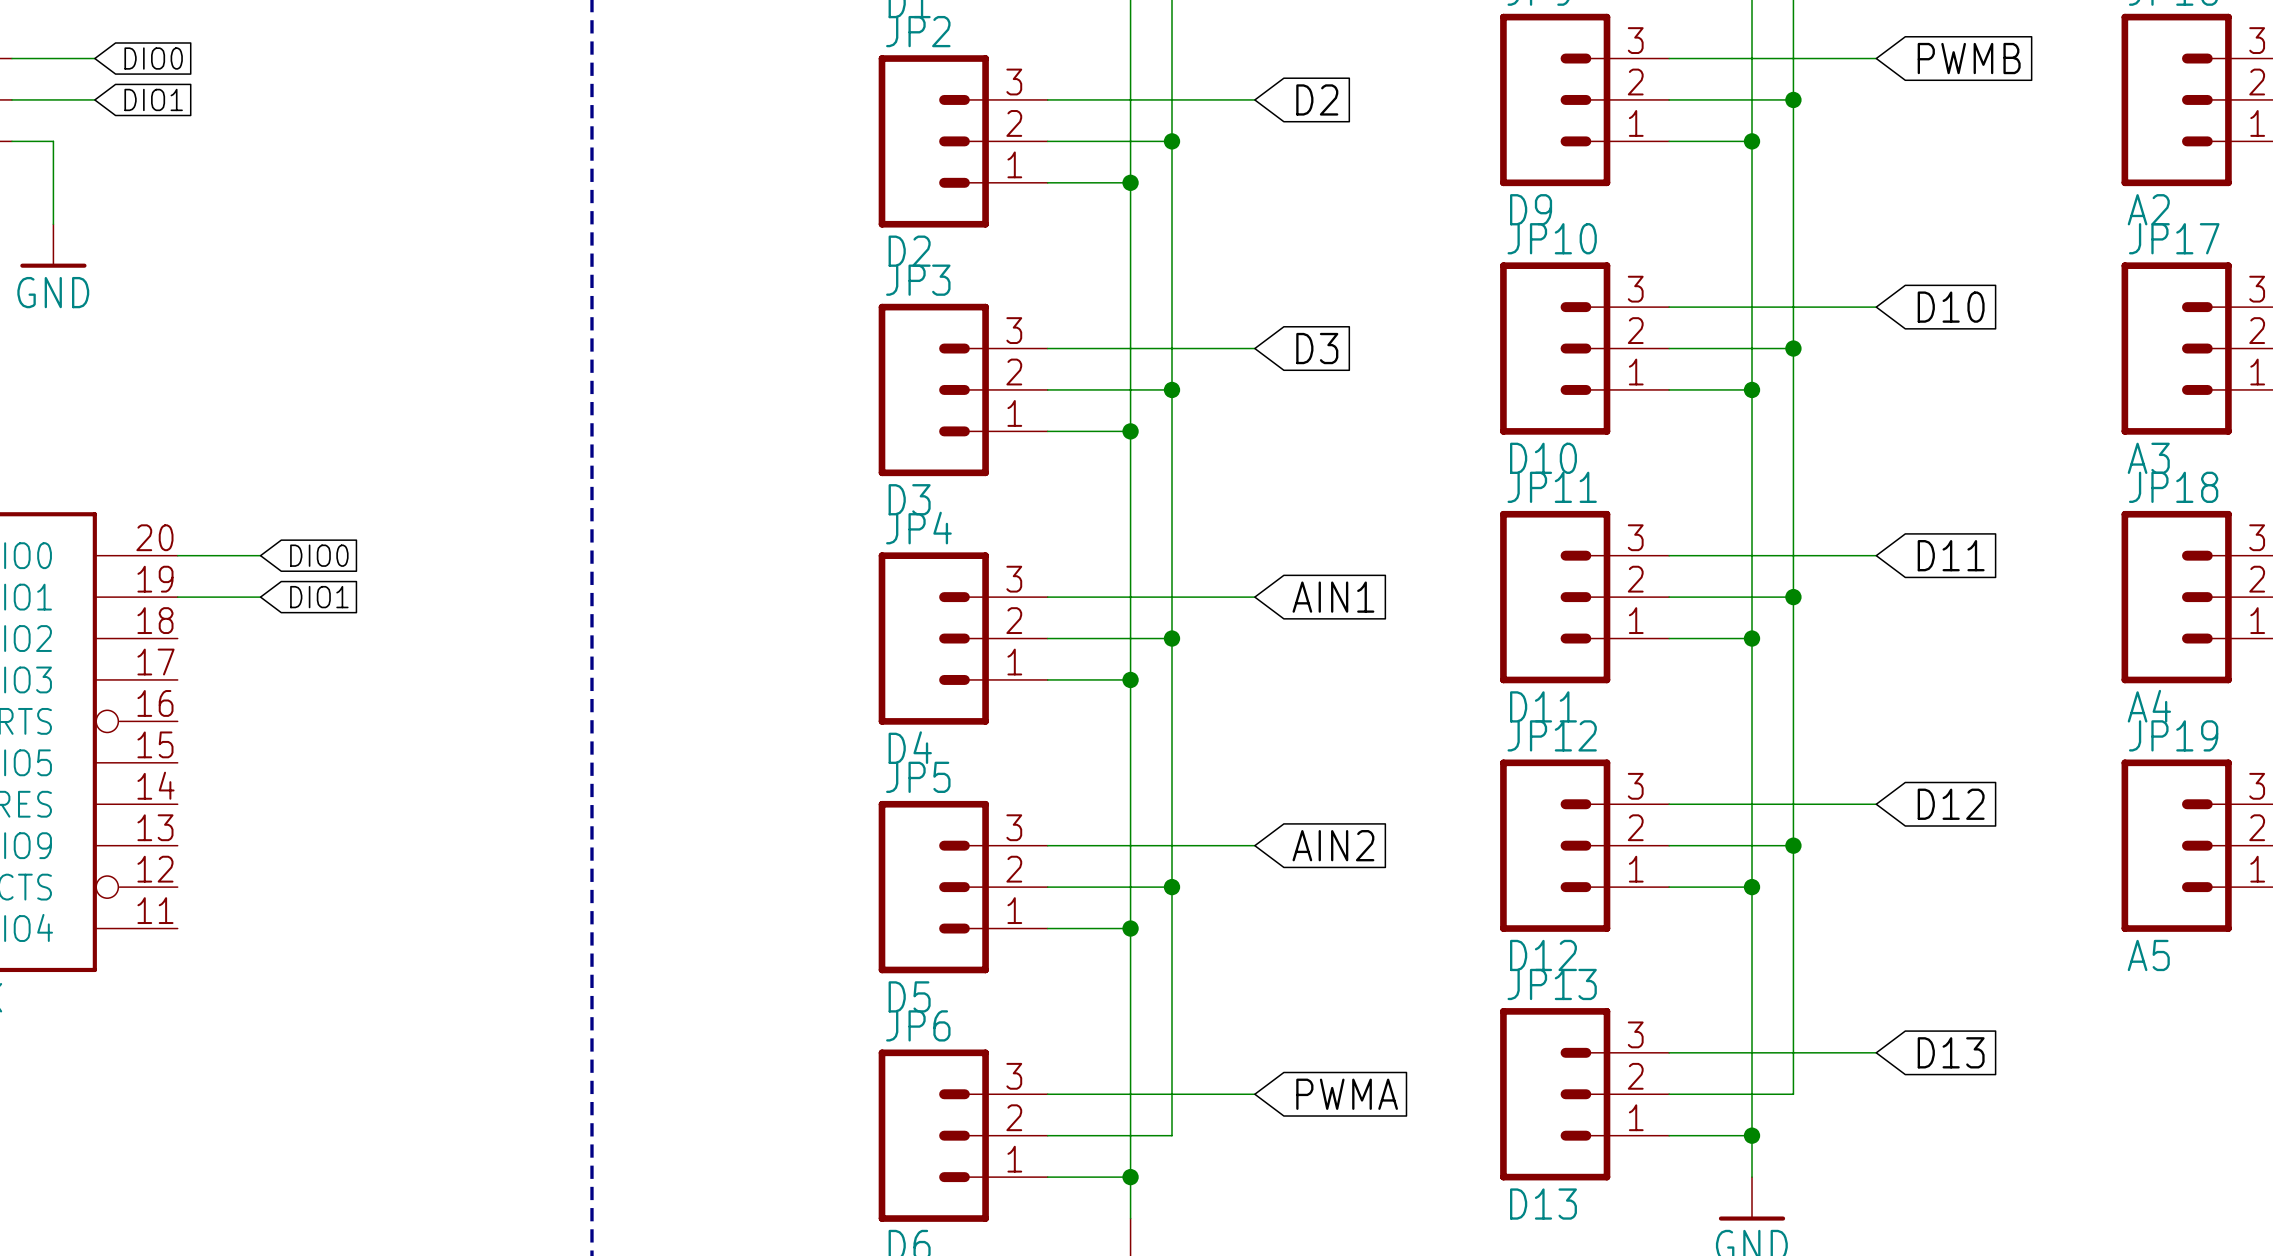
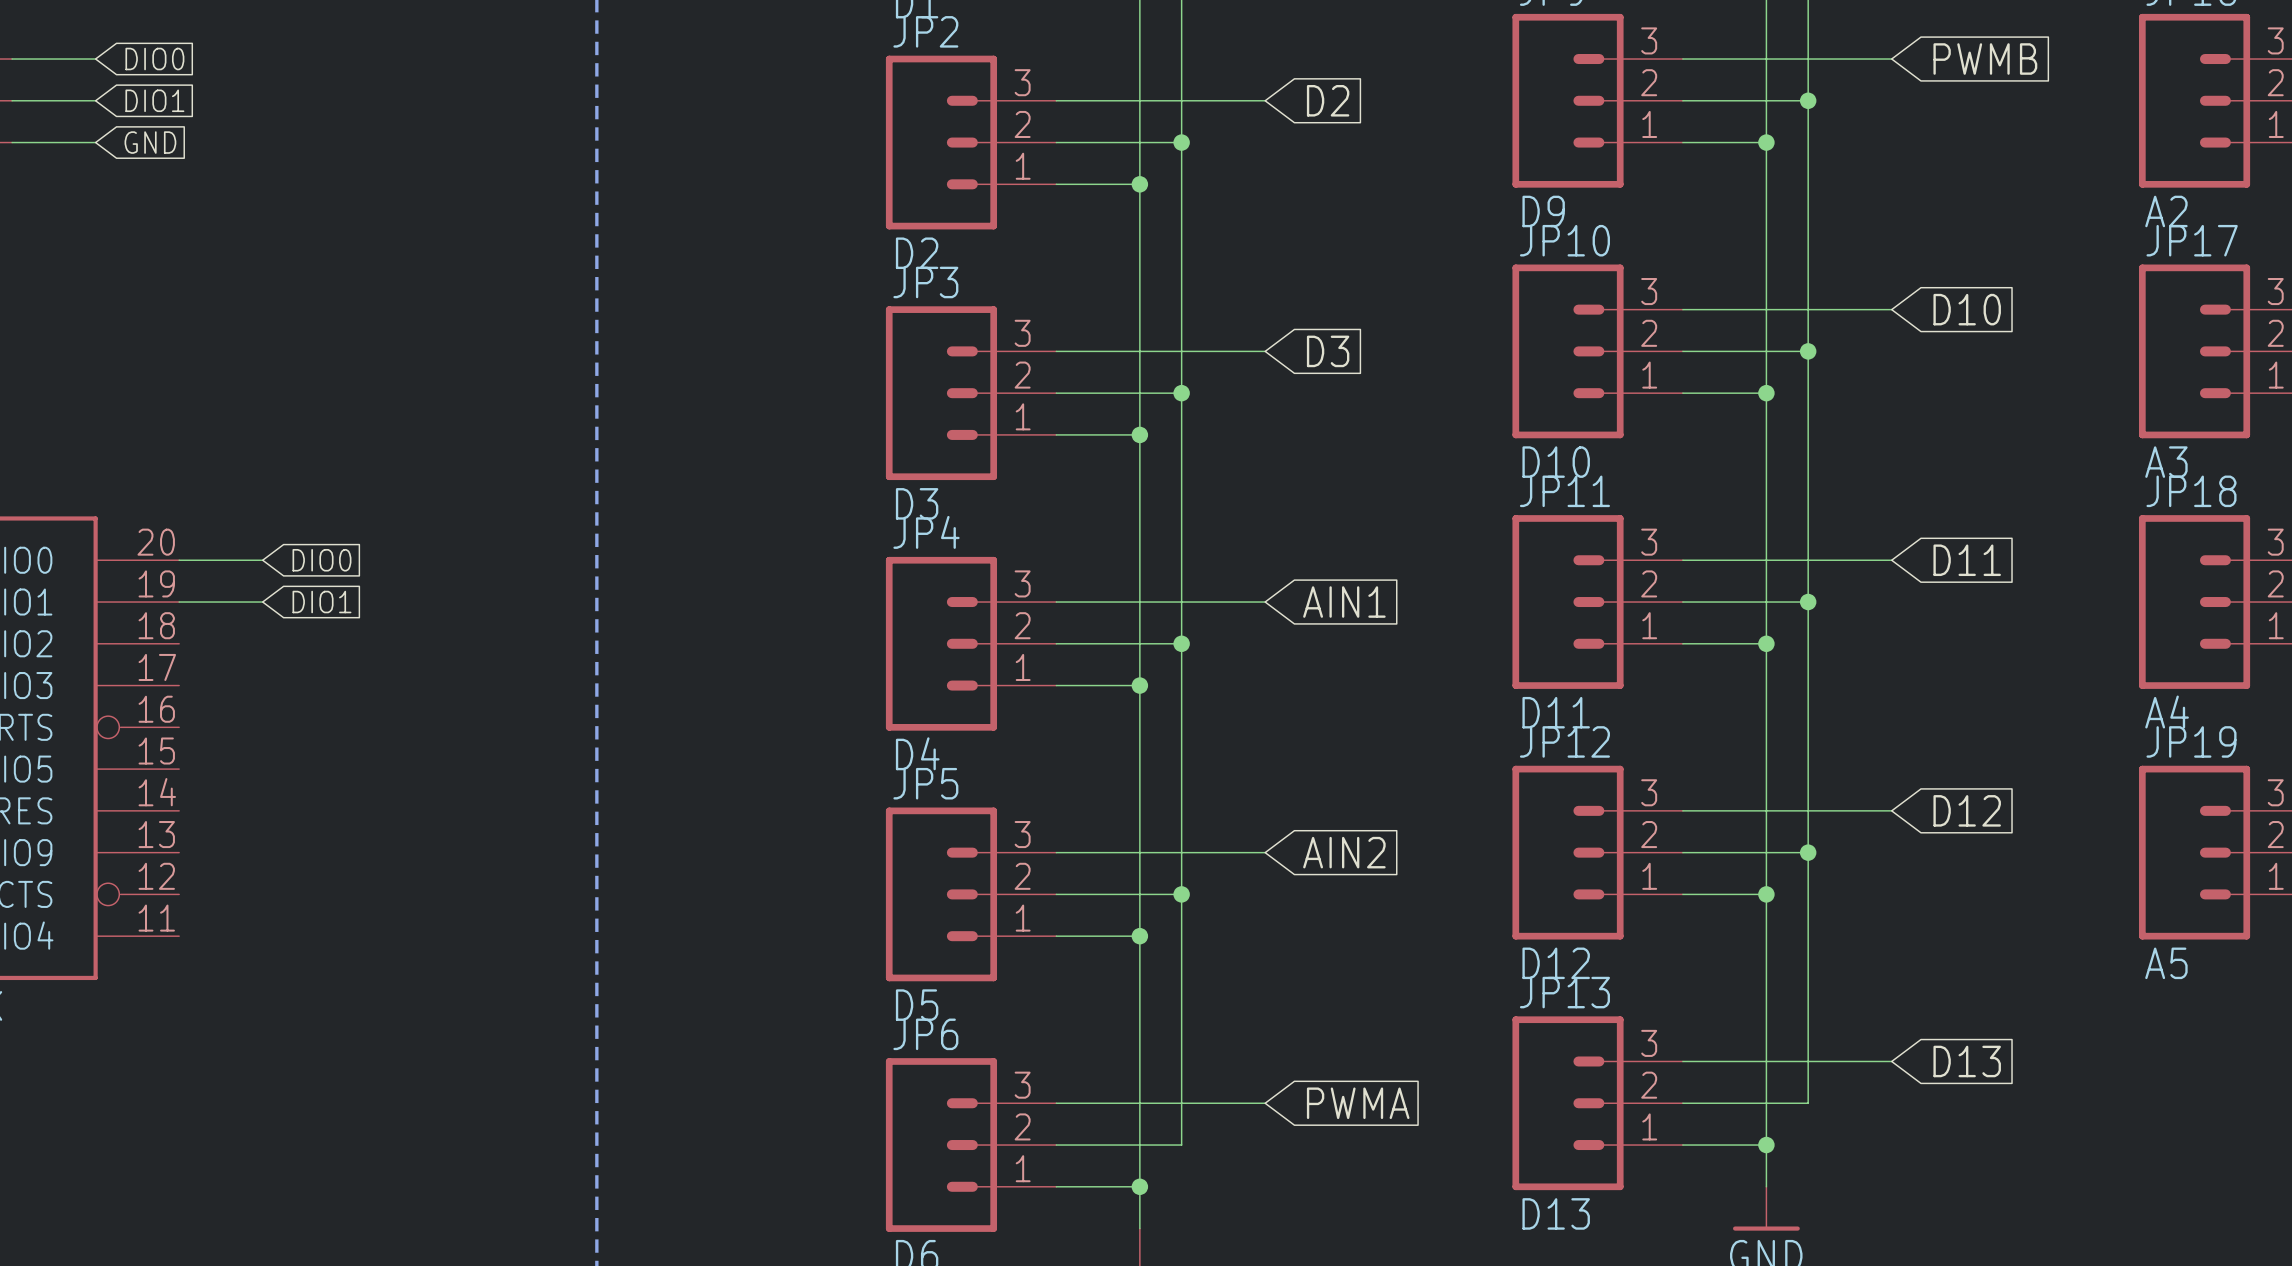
wire: (53, 141) (53, 224) -> (53, 142) (95, 142)
global label: none -> GND (150, 142)
power symbol: GND (53, 245) -> none

